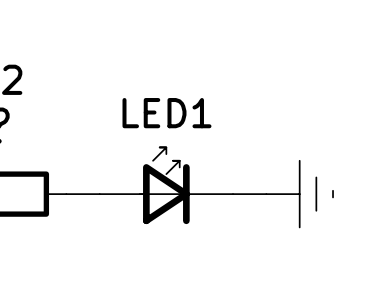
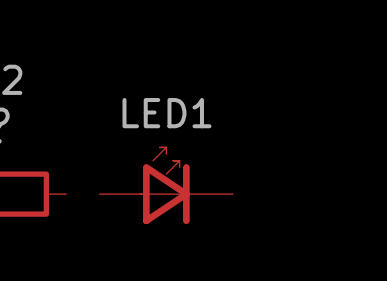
wire: (66, 194) (99, 194) -> none
wire: (233, 194) (266, 194) -> none
power symbol: (299, 194) -> none

